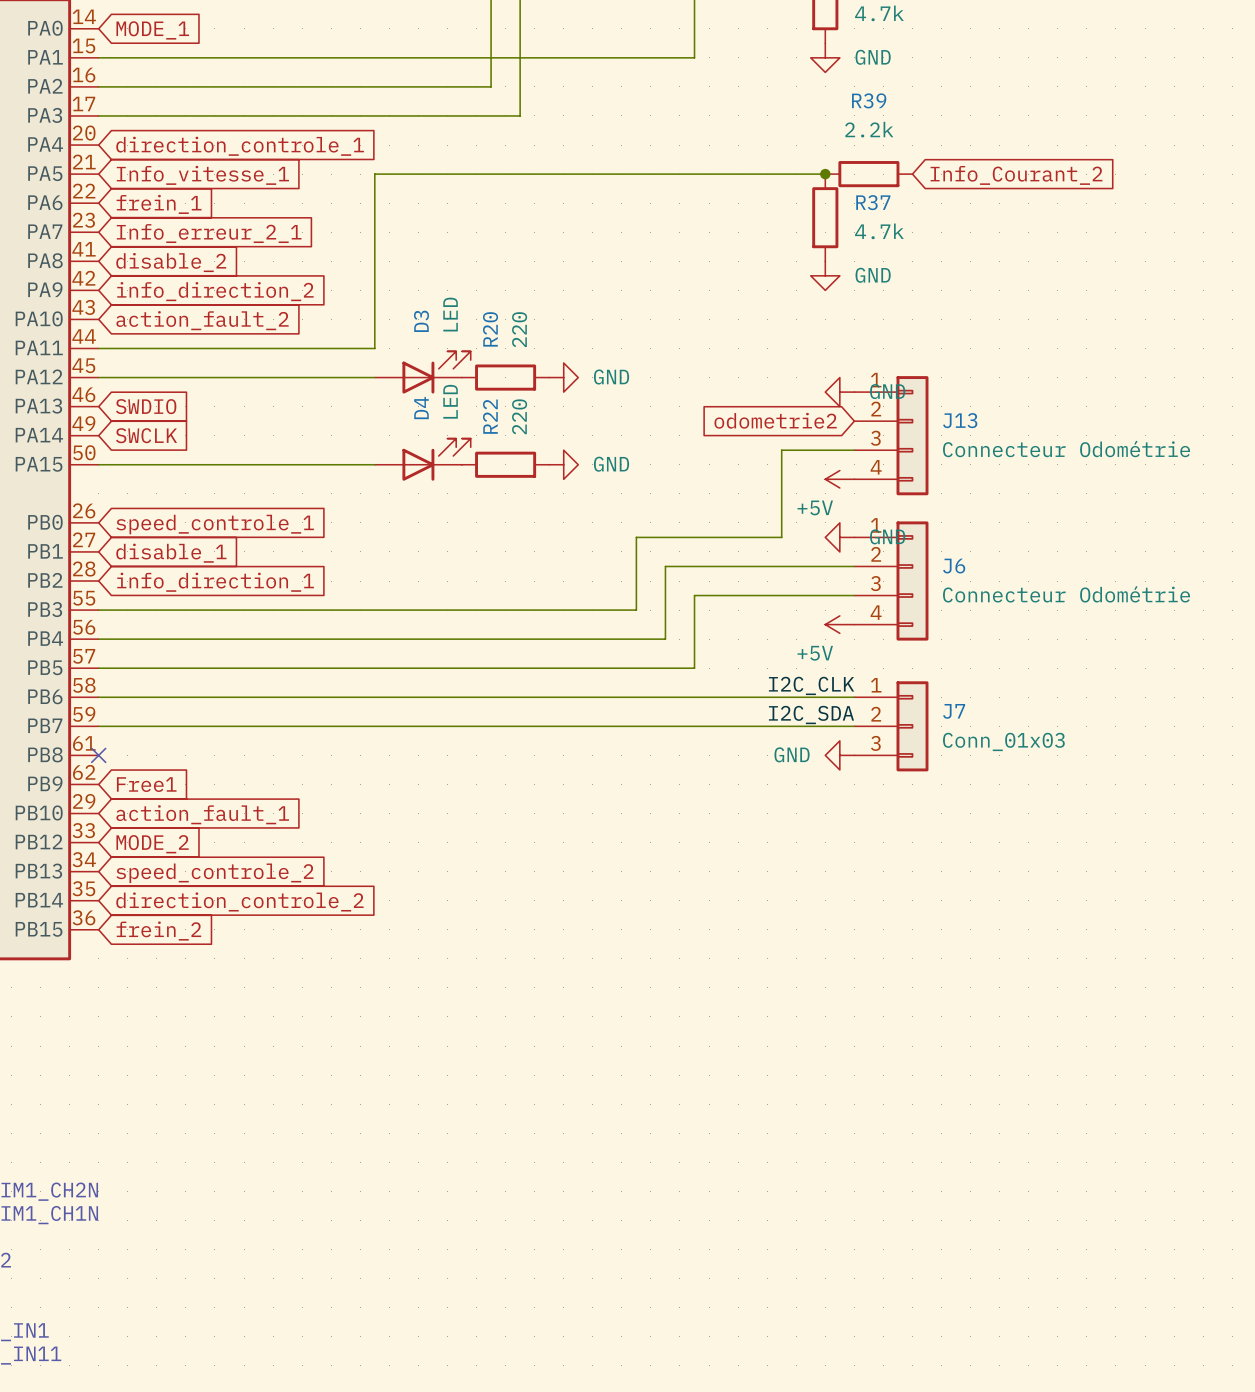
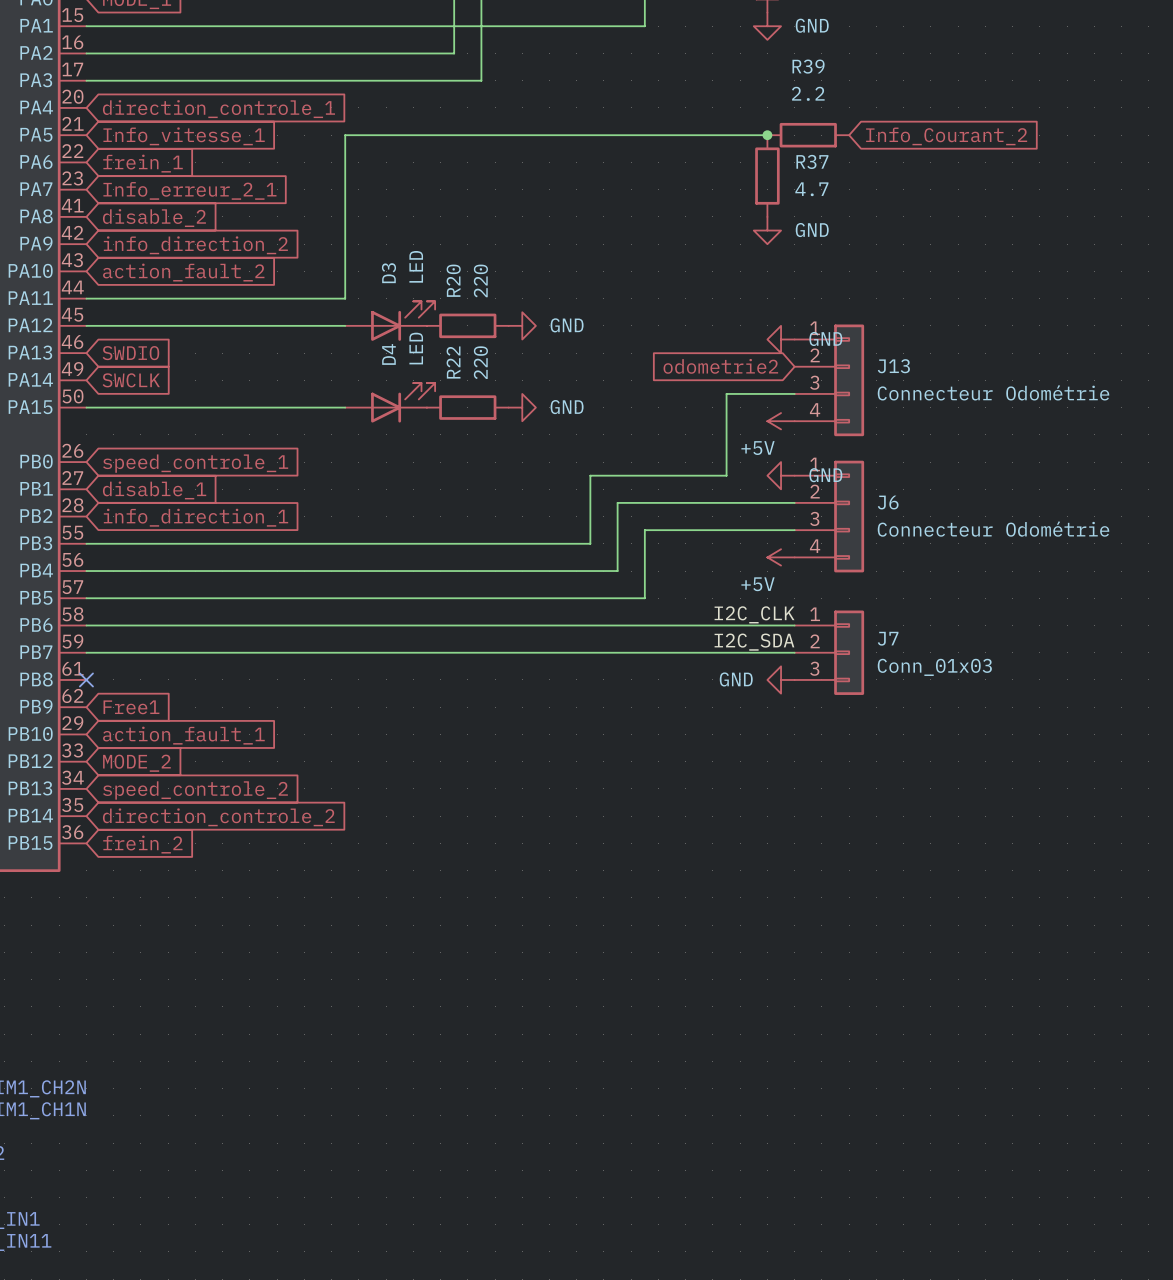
R39 value: 2.2k (869, 129) -> 2.2 (808, 93)
R37 value: 4.7k (879, 231) -> 4.7 (811, 189)

